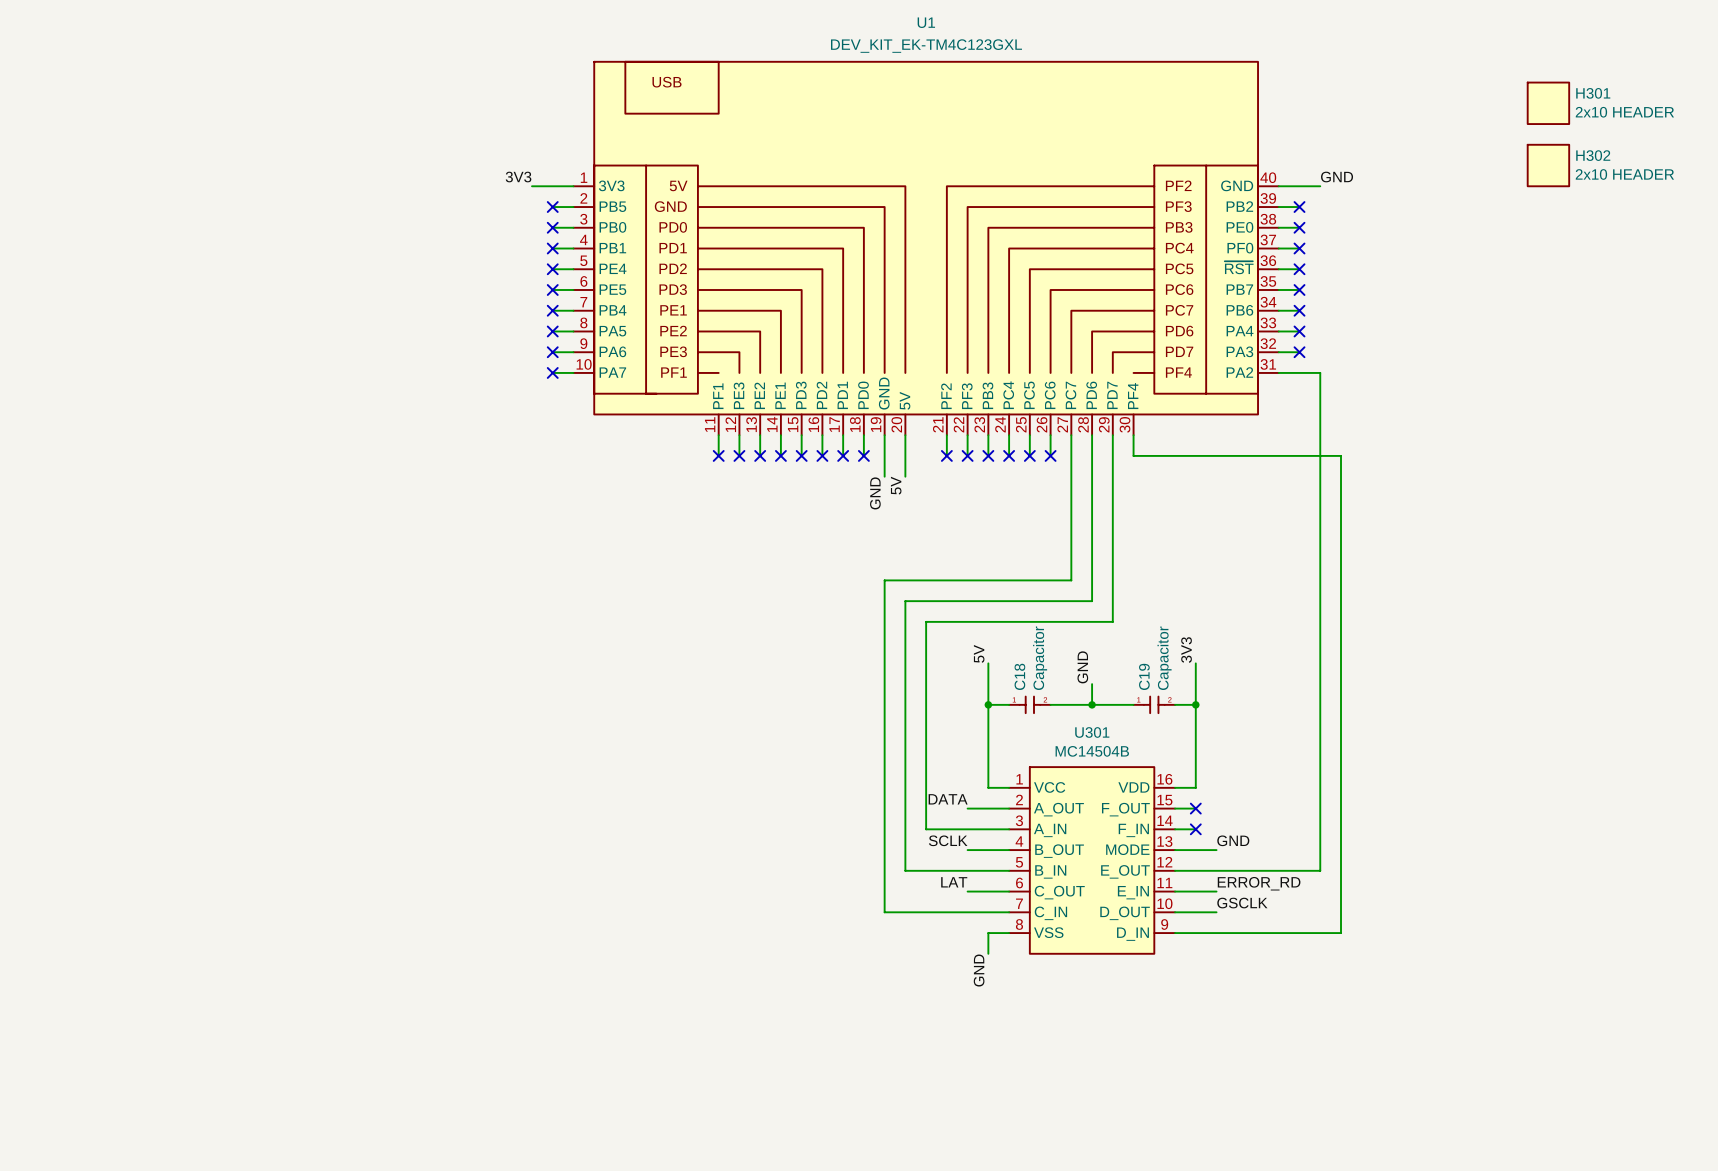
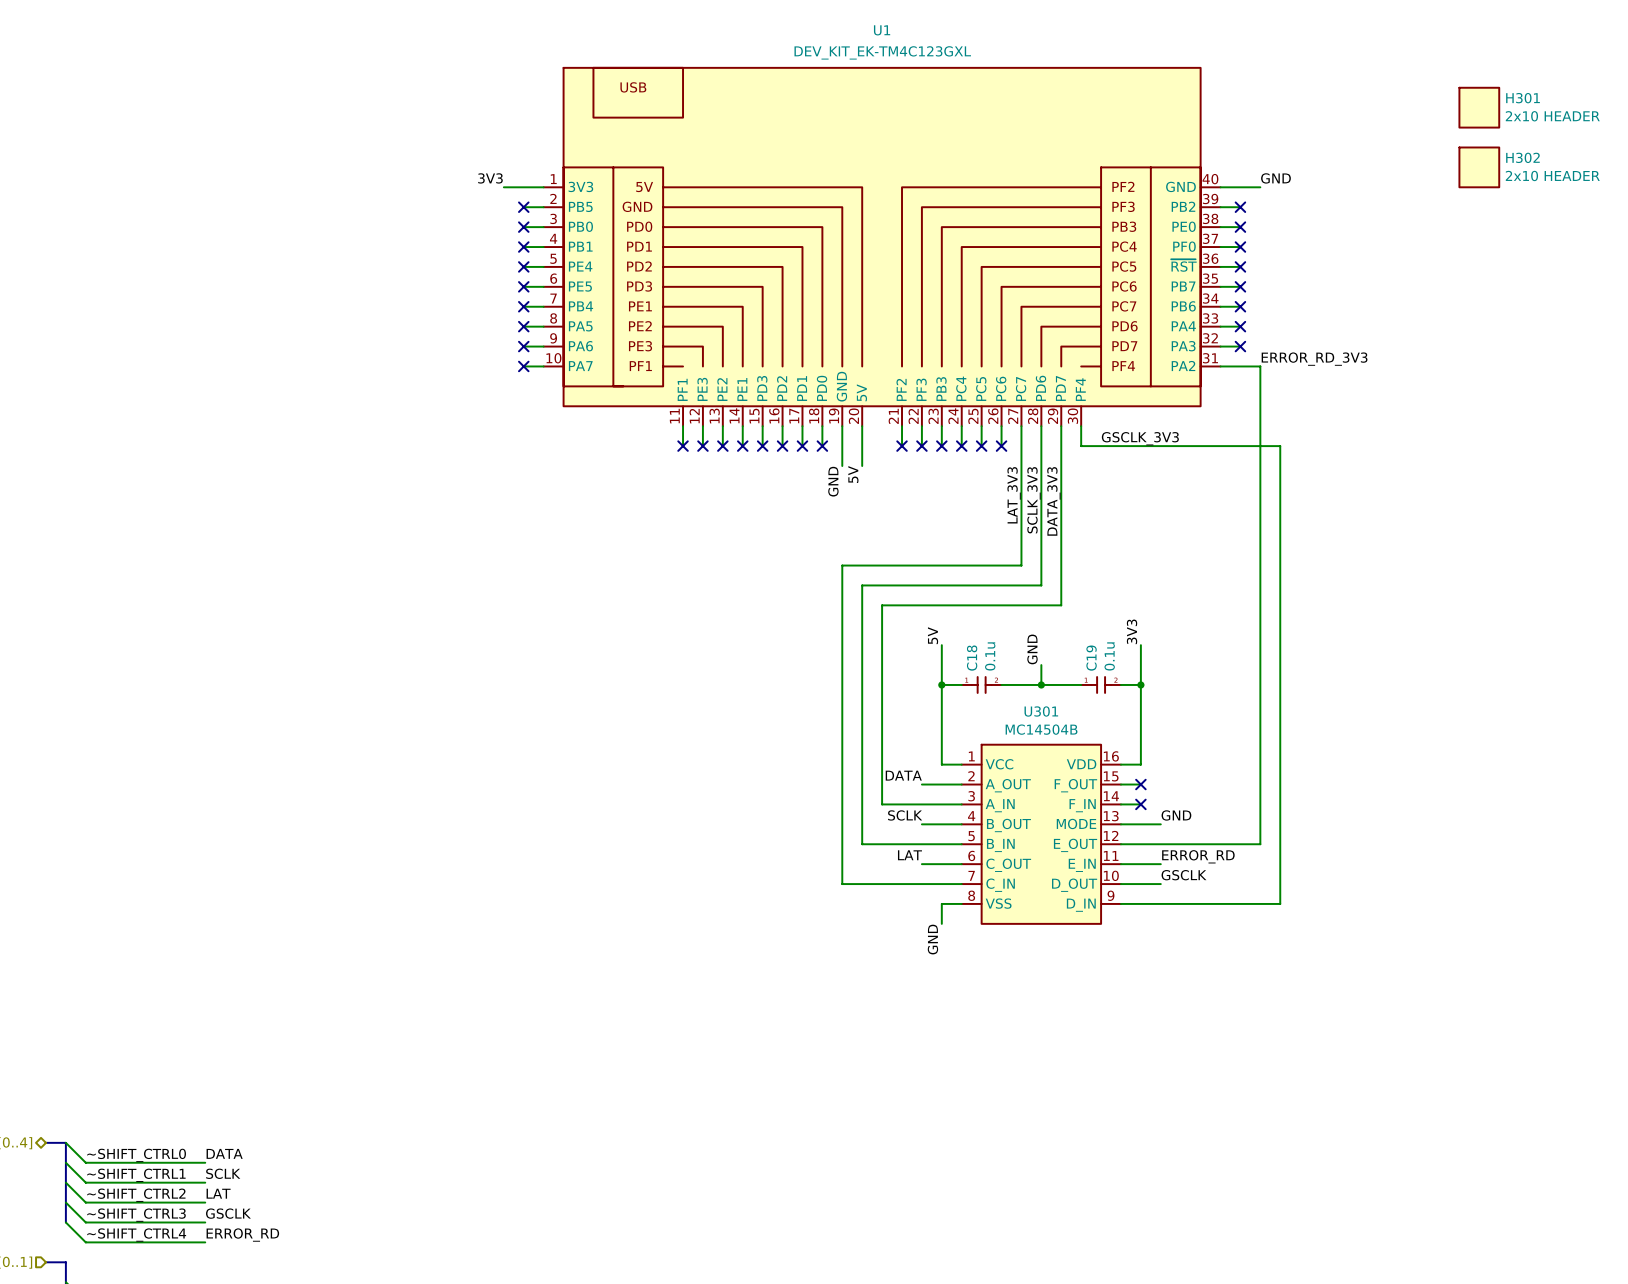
label: none -> ERROR_RD_3V3 (1314, 359)
label: none -> GSCLK_3V3 (1140, 438)
label: none -> LAT_3V3 (1014, 495)
label: none -> SCLK_3V3 (1033, 500)
label: none -> DATA_3V3 (1053, 501)
C18 value: Capacitor (1040, 658) -> 0.1u (990, 656)
C19 value: Capacitor (1164, 658) -> 0.1u (1109, 656)

